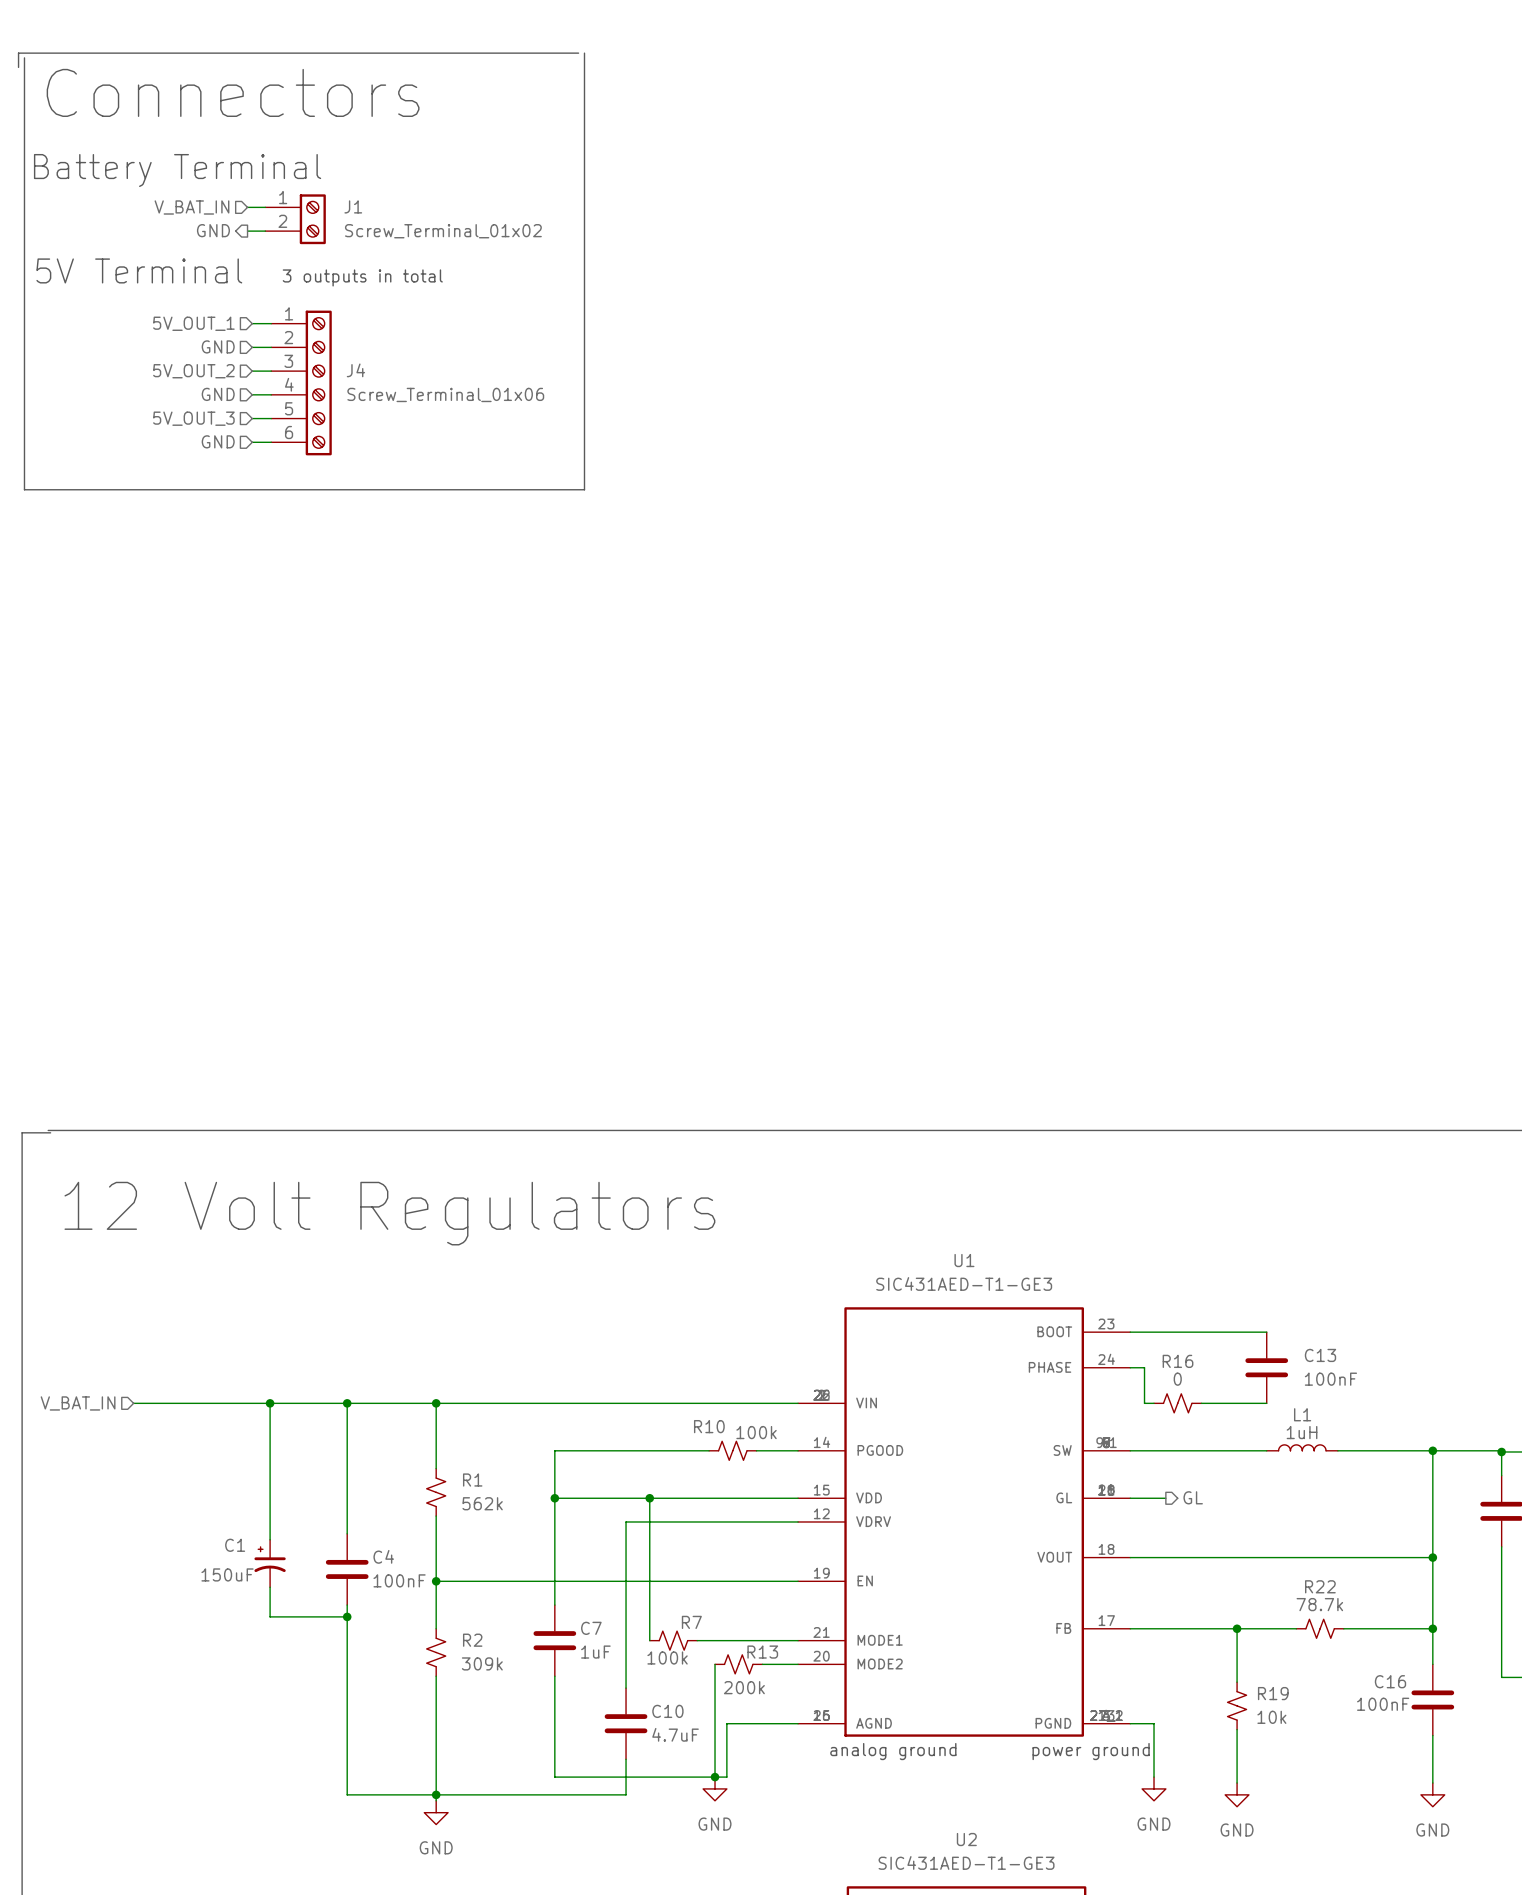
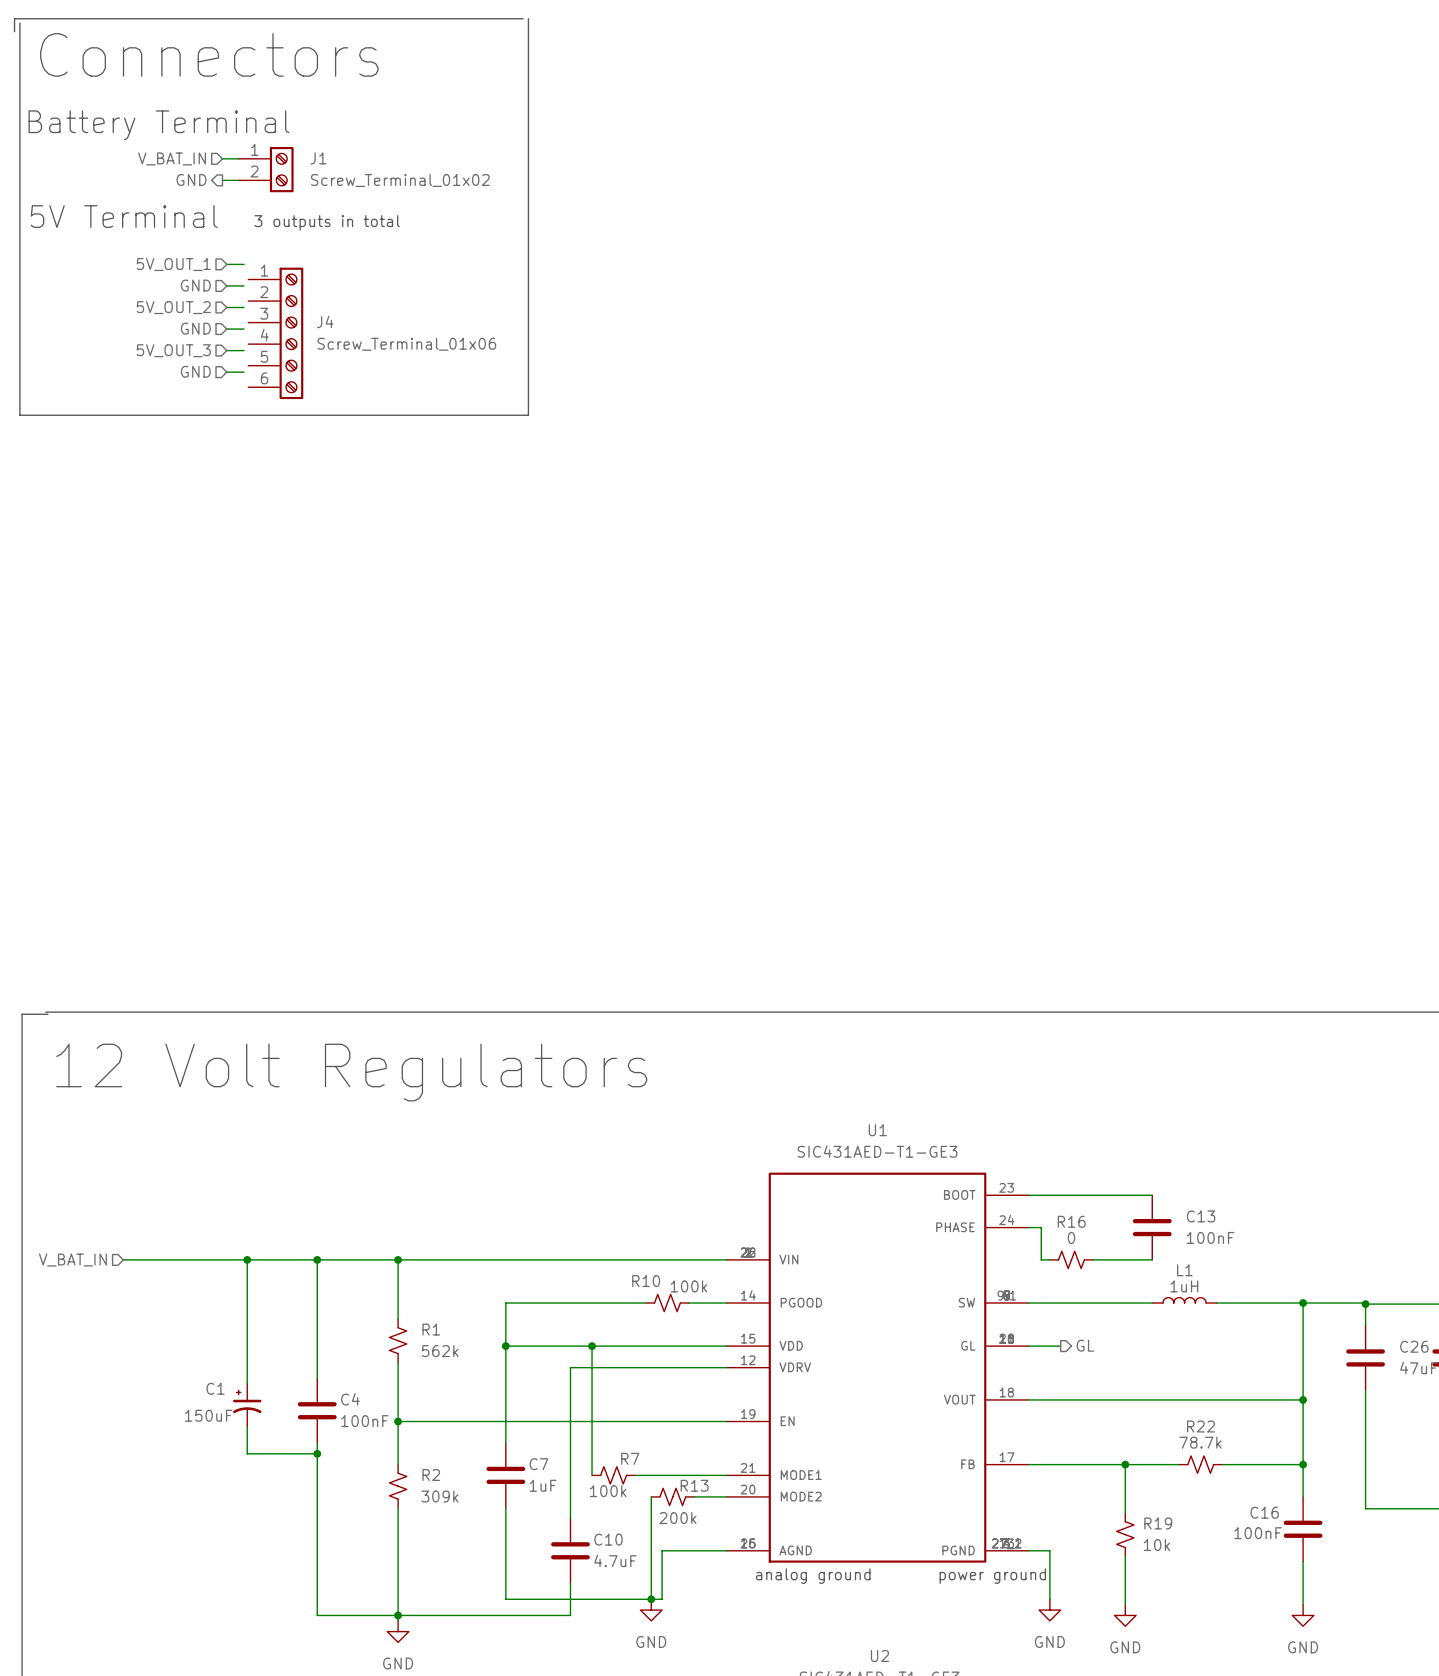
line: (578, 53) (18, 53) (18, 67) -> (523, 18) (14, 18) (14, 31)
line: (584, 53) (584, 489) (24, 489) (24, 57) -> (528, 18) (528, 415) (19, 415) (19, 23)
text position: Connectors (233, 92) -> Connectors (209, 54)
text position: Battery Terminal (177, 170) -> Battery Terminal (158, 125)
hierarchical label position: V_BAT_IN (191, 207) -> V_BAT_IN (172, 158)
wire: (247, 207) (265, 207) -> (222, 158) (238, 158)
J1 position: (295, 219) -> (266, 169)
hierarchical label position: GND (213, 230) -> GND (191, 179)
wire: (247, 231) (265, 231) -> (222, 180) (238, 180)
text position: 5V Terminal (139, 270) -> 5V Terminal (124, 216)
text position: 3 outputs in total (362, 277) -> 3 outputs in total (327, 222)
hierarchical label position: 5V_OUT_1 (193, 323) -> 5V_OUT_1 (173, 264)
wire: (252, 323) (271, 323) -> (226, 264) (244, 264)
hierarchical label position: GND (218, 346) -> GND (195, 285)
wire: (252, 347) (271, 347) -> (226, 285) (244, 285)
hierarchical label position: 5V_OUT_2 (193, 371) -> 5V_OUT_2 (173, 307)
wire: (252, 371) (271, 371) -> (226, 307) (244, 307)
hierarchical label position: GND (218, 394) -> GND (195, 328)
wire: (252, 394) (271, 394) -> (226, 329) (244, 329)
hierarchical label position: 5V_OUT_3 (193, 418) -> 5V_OUT_3 (173, 350)
wire: (252, 418) (271, 418) -> (226, 350) (244, 350)
hierarchical label position: GND (218, 441) -> GND (195, 371)
wire: (252, 442) (271, 442) -> (226, 372) (244, 372)
text position: 12 Volt Regulators (389, 1213) -> 12 Volt Regulators (351, 1072)

